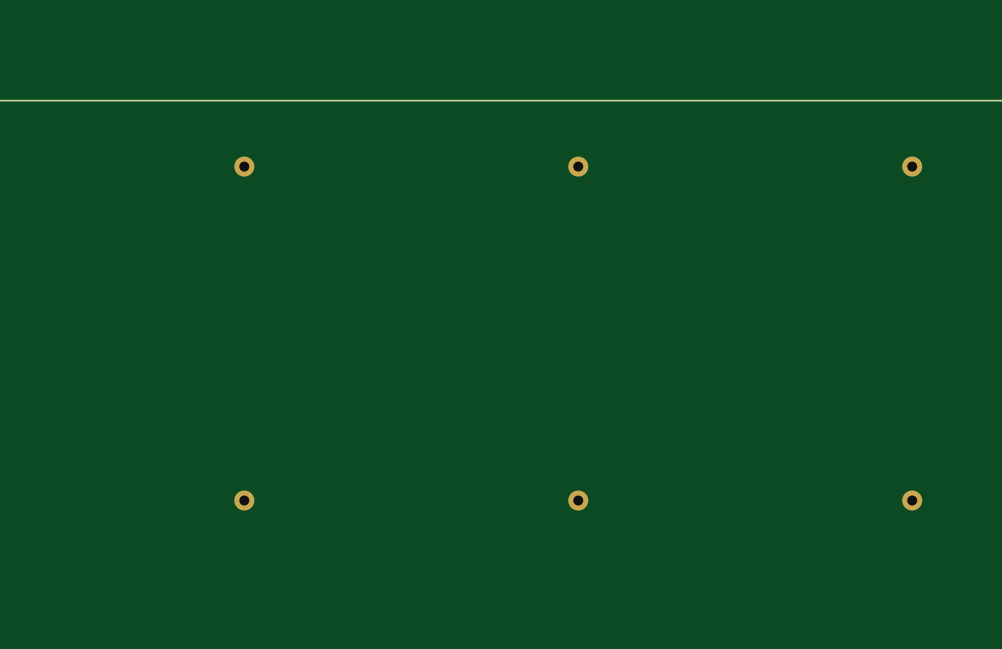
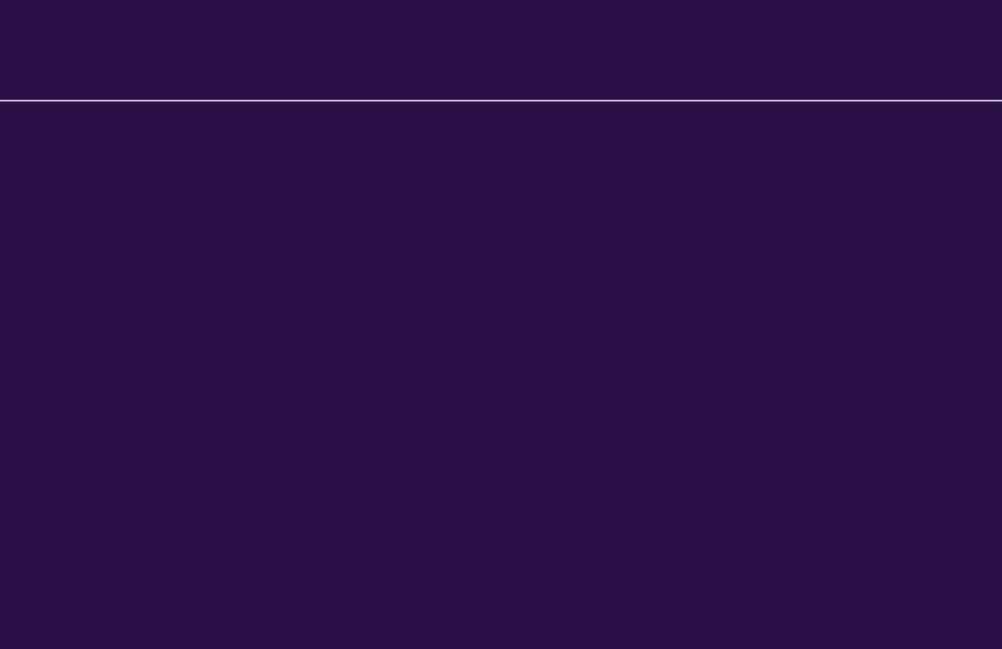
via: (244, 166) -> none
via: (578, 166) -> none
via: (912, 166) -> none
via: (244, 500) -> none
via: (578, 500) -> none
via: (912, 500) -> none

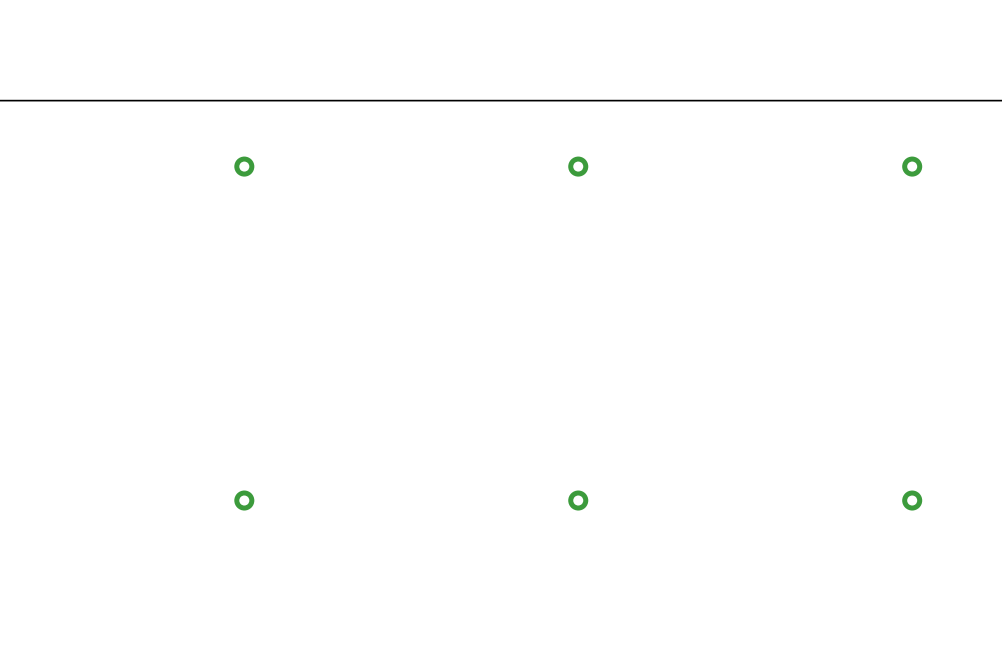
via: none -> (244, 166)
via: none -> (578, 166)
via: none -> (912, 166)
via: none -> (244, 500)
via: none -> (578, 500)
via: none -> (912, 500)

